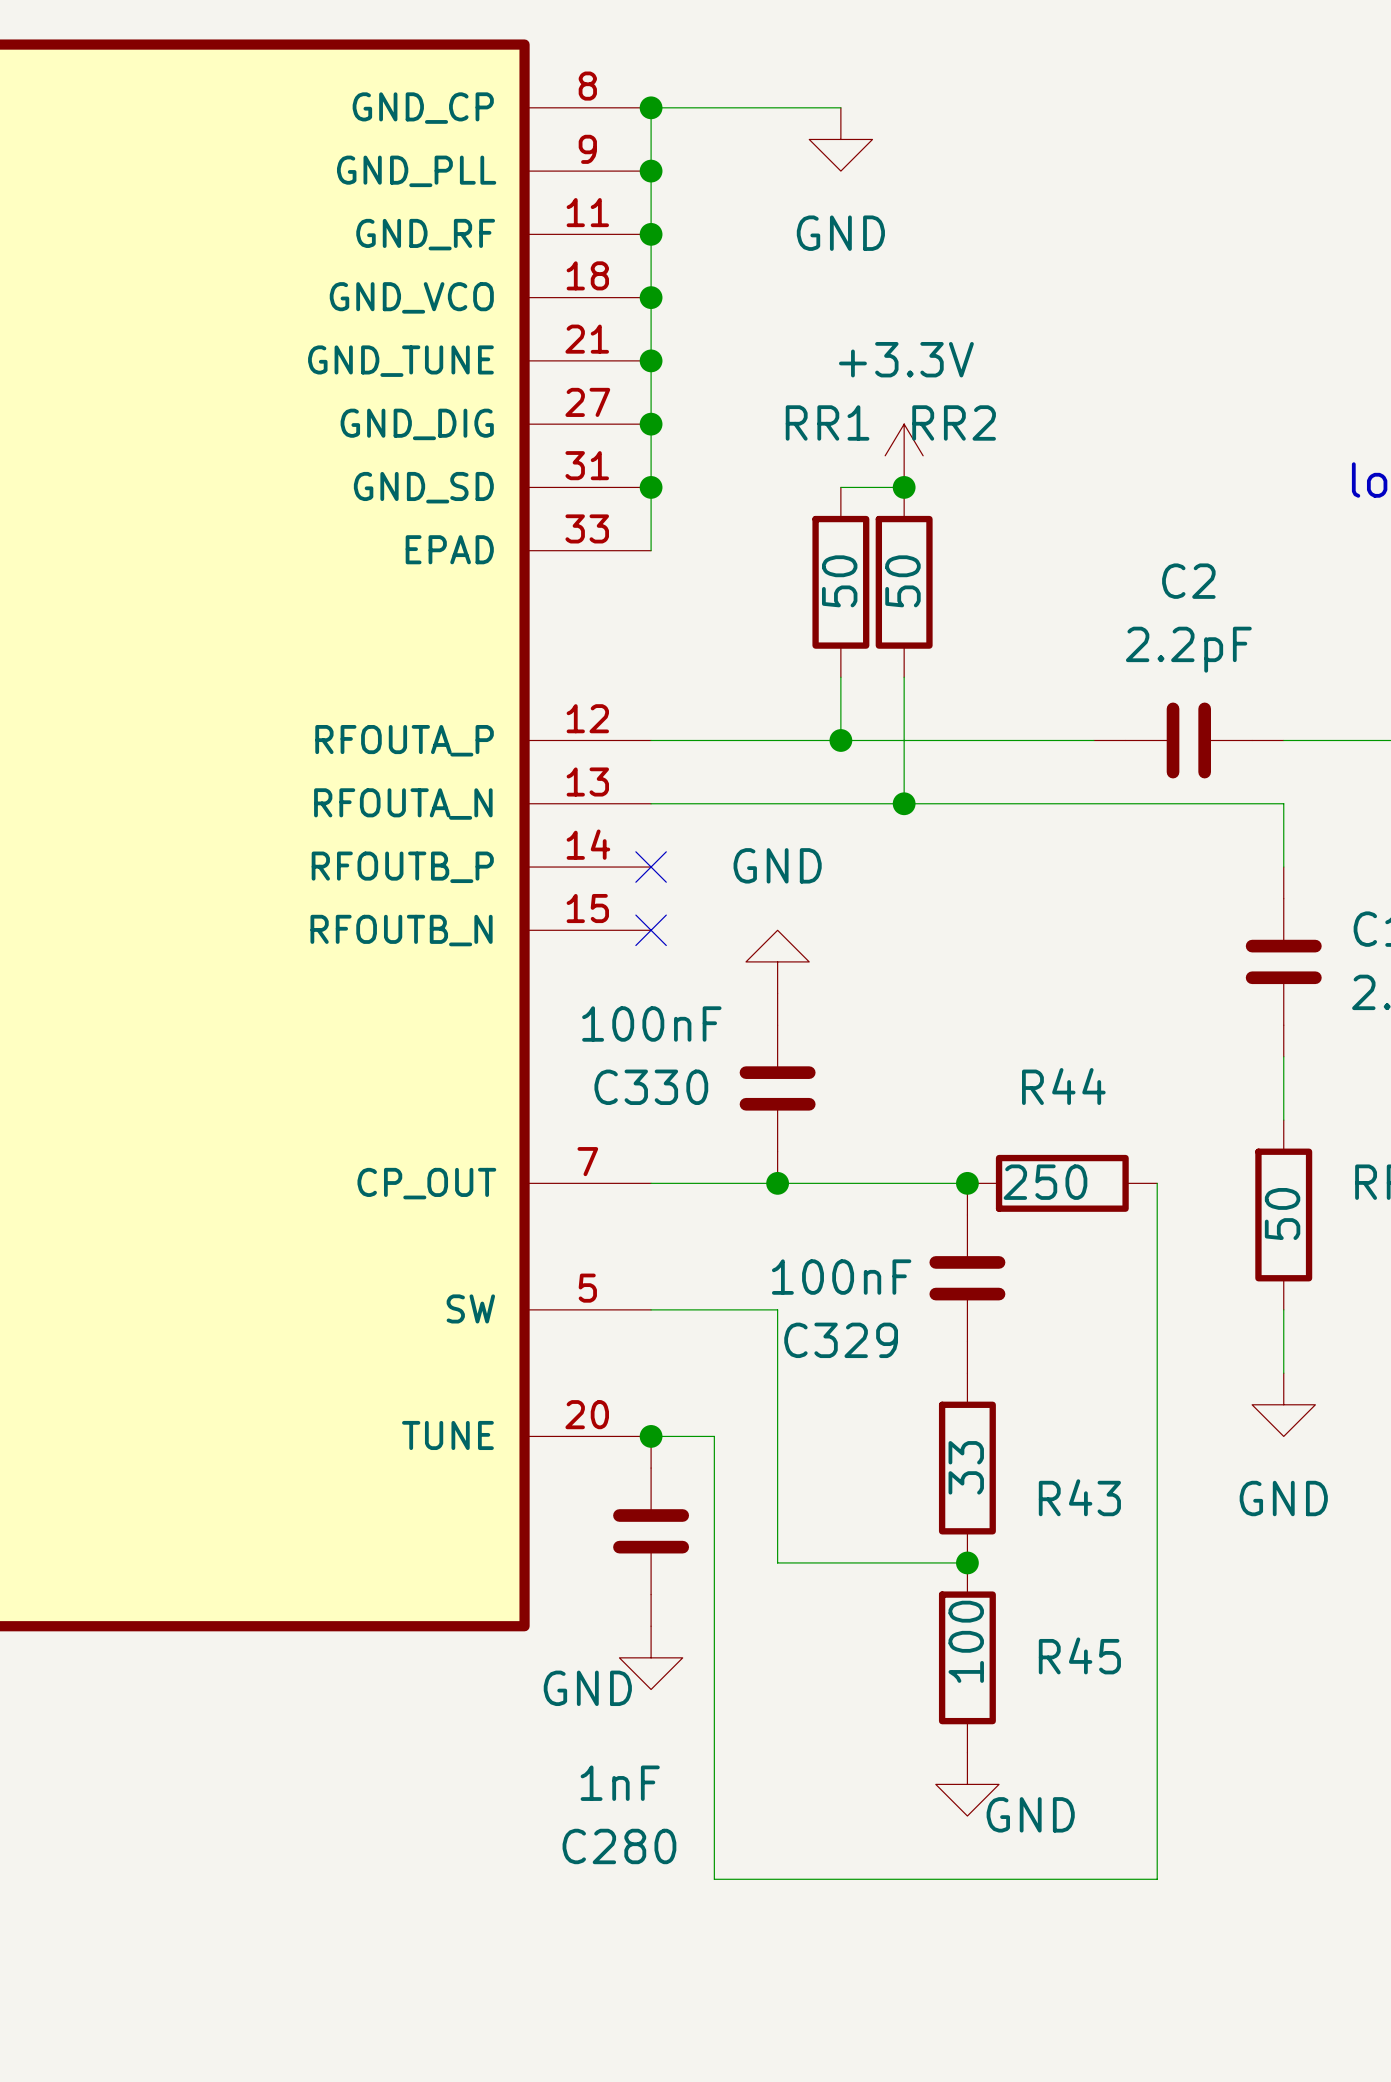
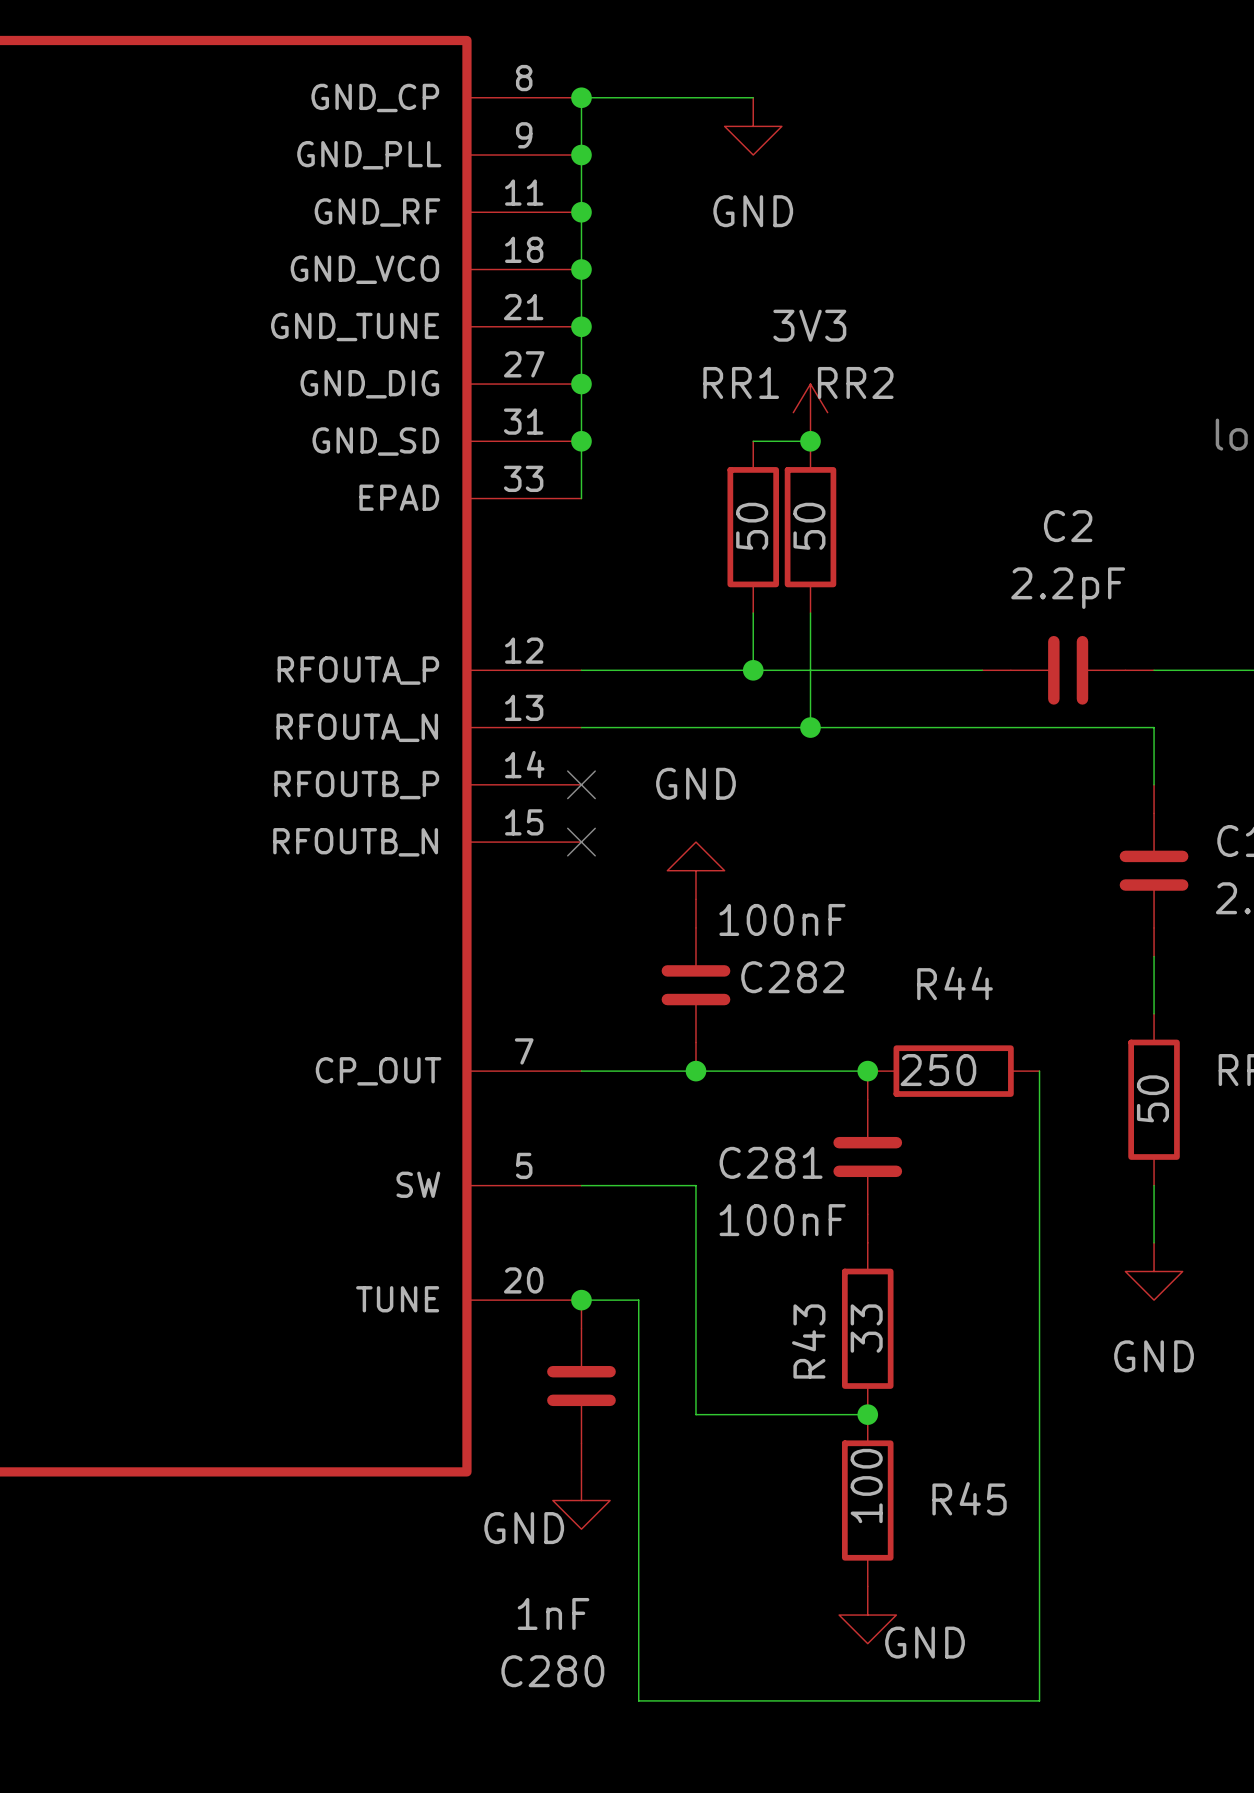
power symbol: +3.3V (904, 455) -> 3V3 (810, 412)
C330 value position: 100nF (651, 1024) -> 100nF (782, 919)
C330 name: C330 (651, 1087) -> C282 (792, 977)
C329 value position: 100nF (841, 1277) -> 100nF (782, 1220)
C329 name: C329 (841, 1340) -> C281 (771, 1162)
R43 name rotation: 0° (1079, 1497) -> 90° counterclockwise (808, 1341)
R43 name position: R43 (1079, 1497) -> R43 (808, 1341)

